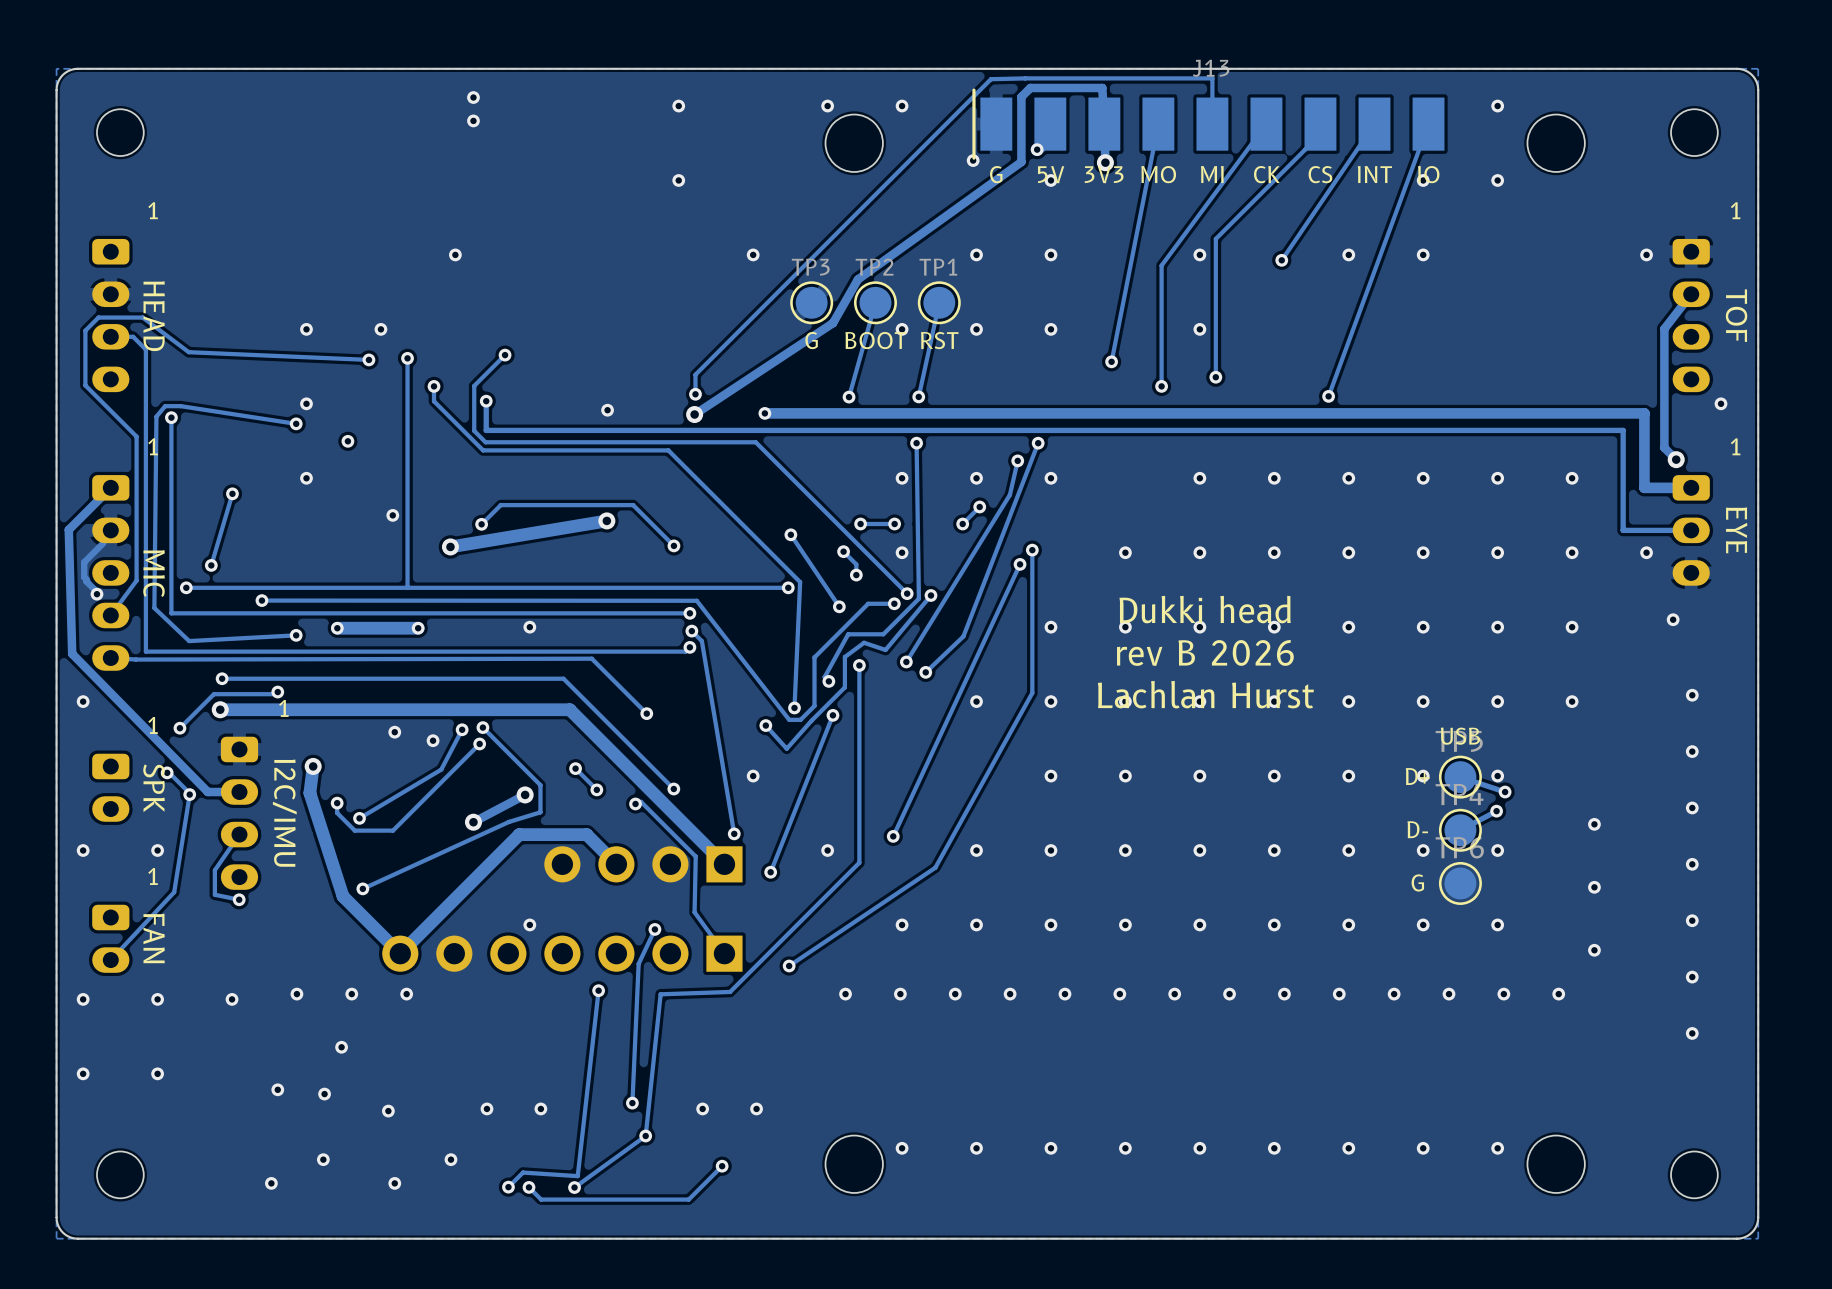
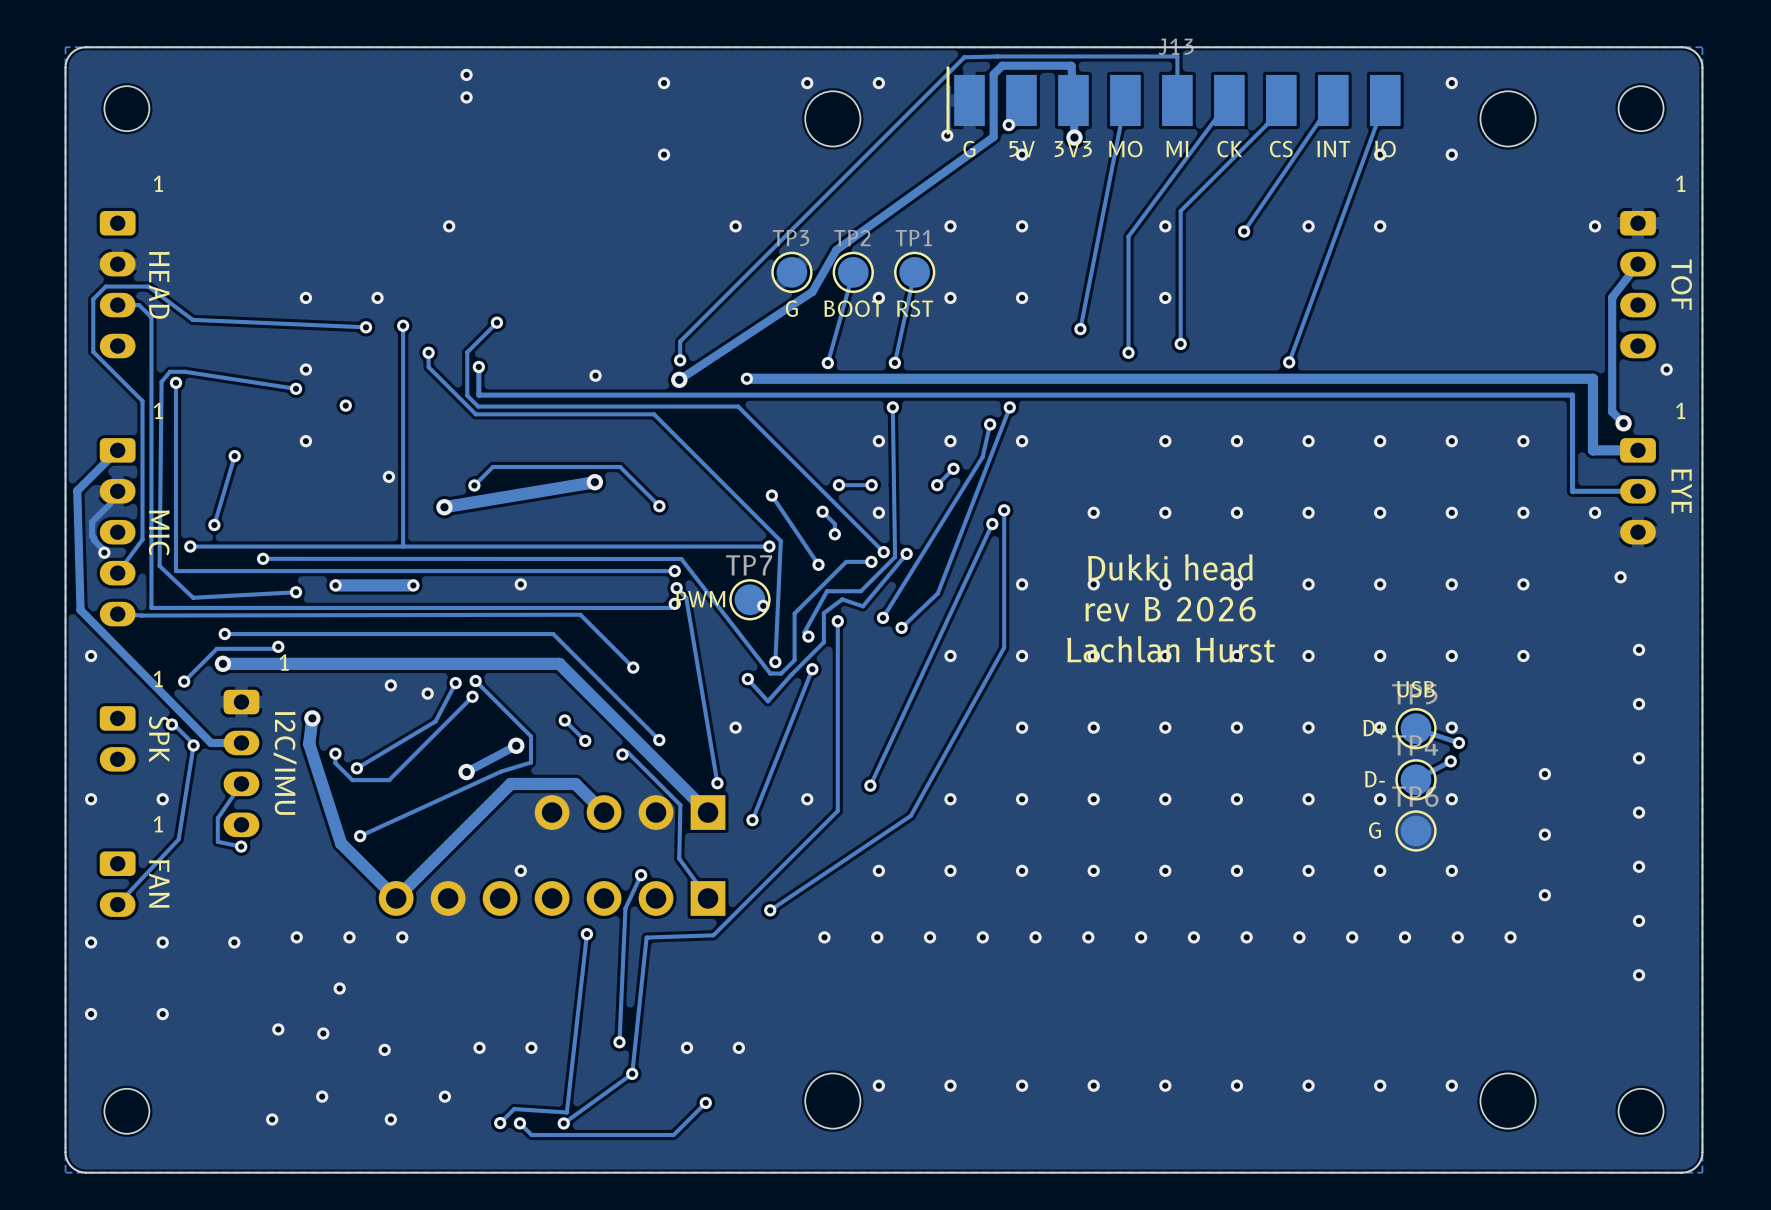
text: none -> PWM (700, 599)
TP7: none -> (749, 599)
via: none -> (763, 605)

